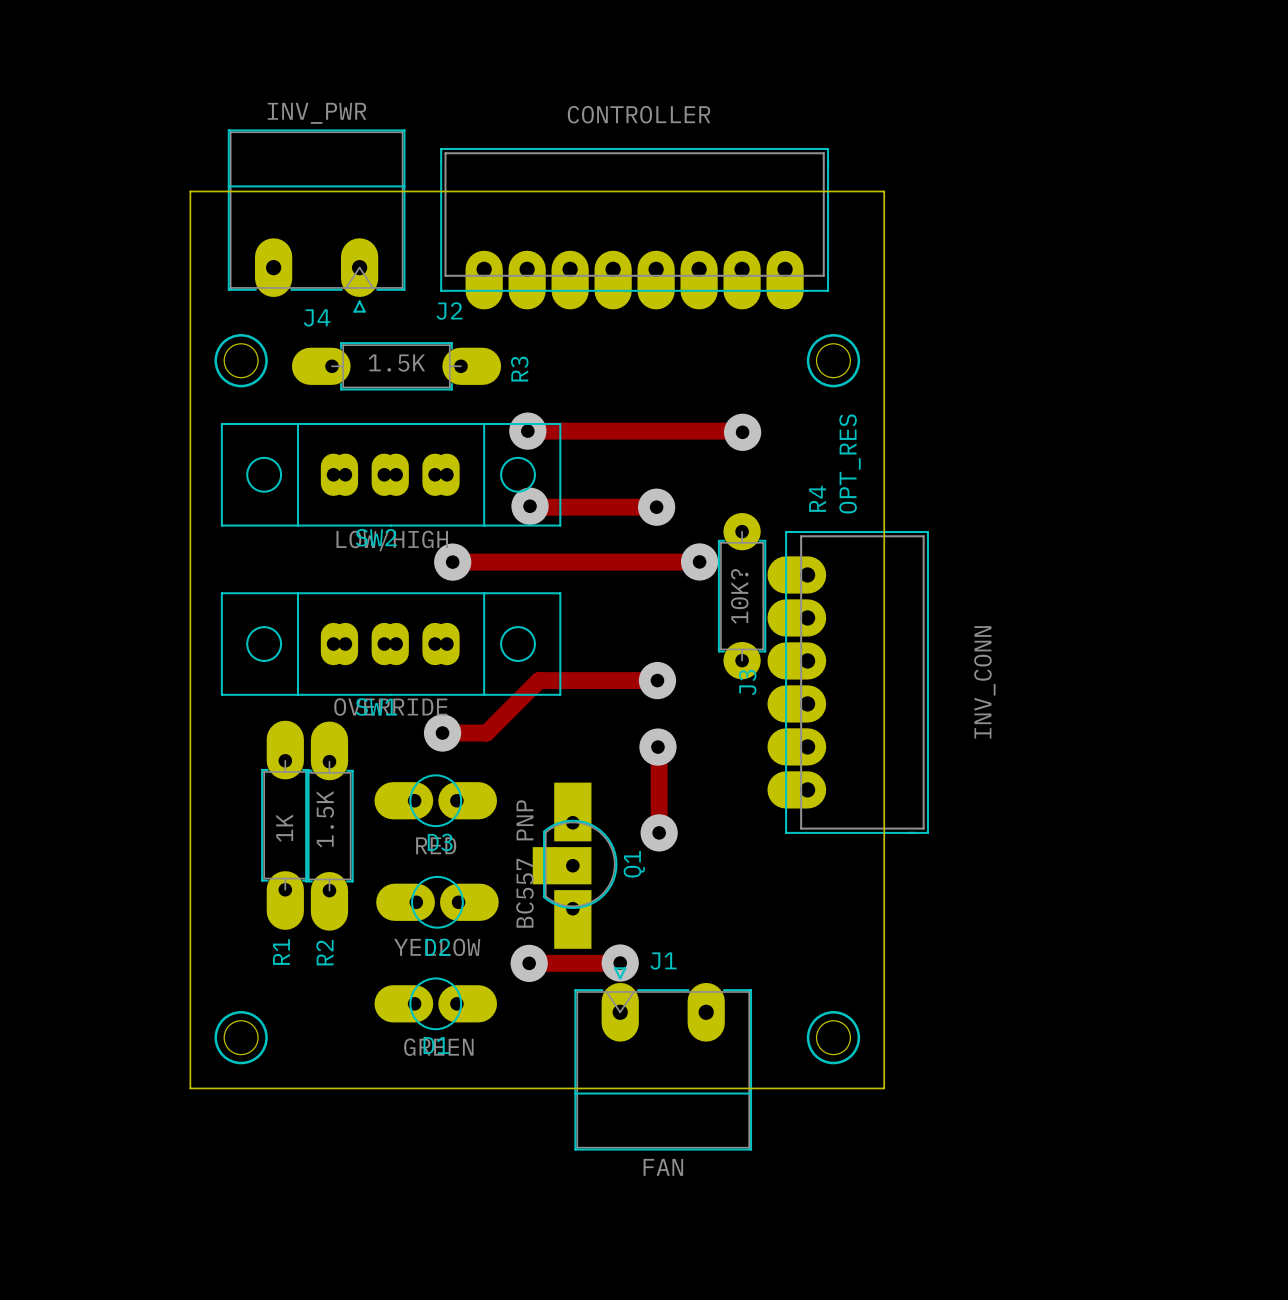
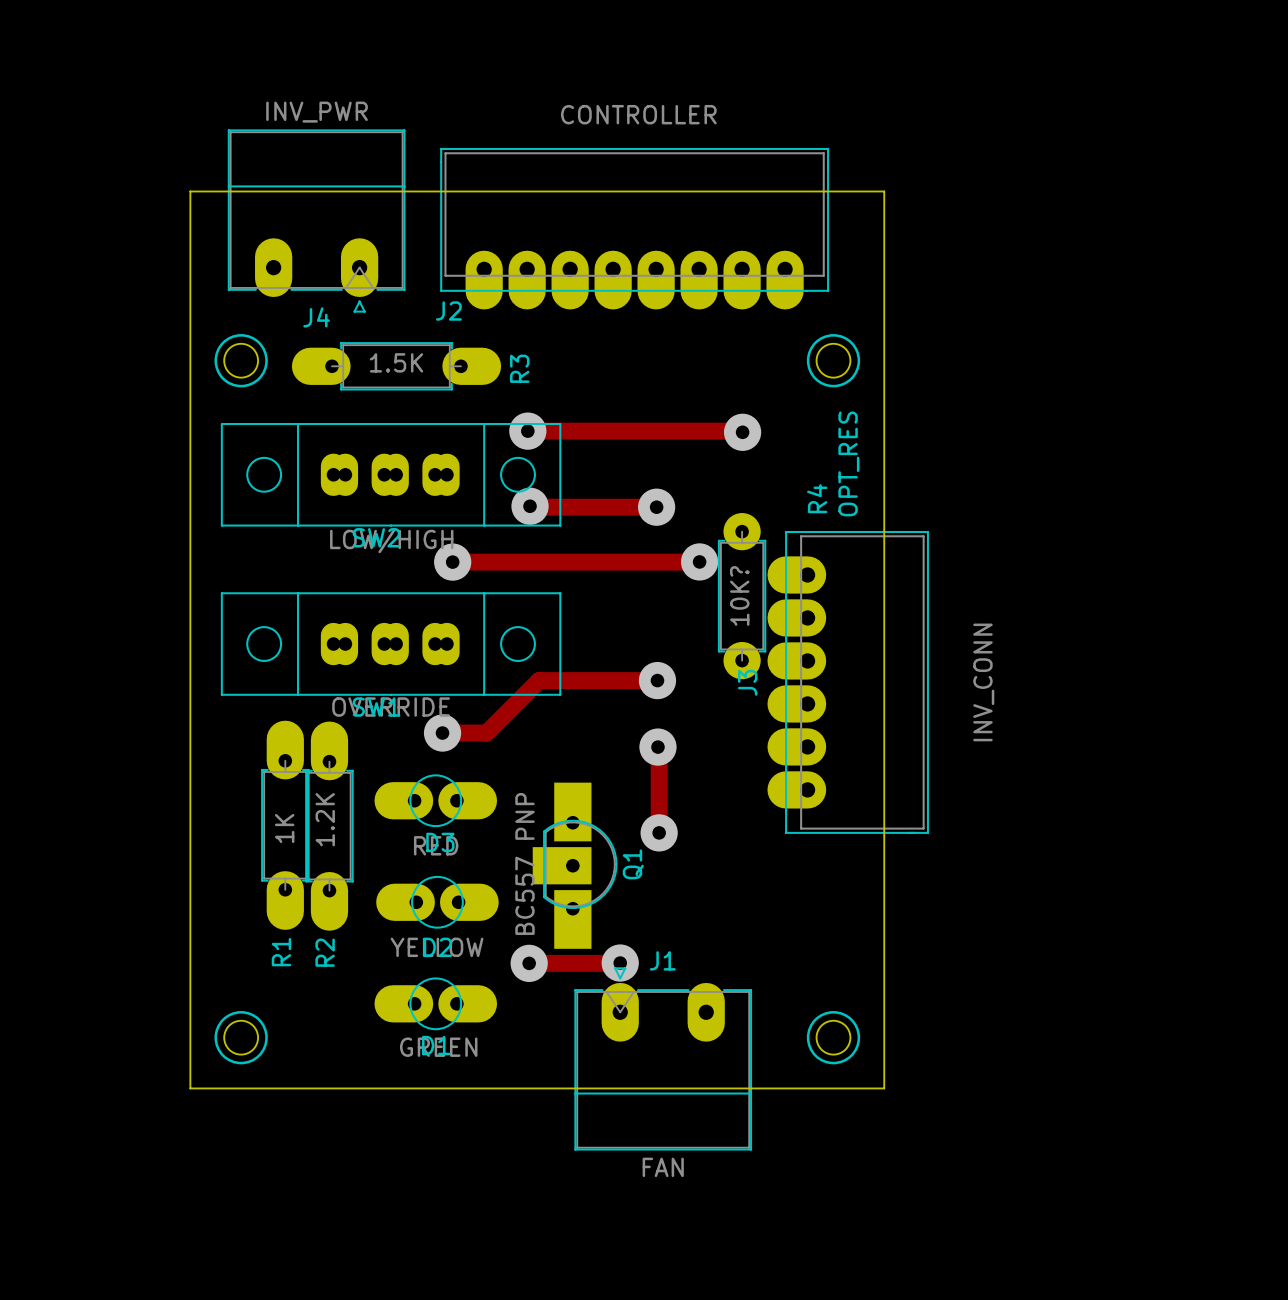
R2 value: 1.5K (325, 819) -> 1.2K (325, 819)

